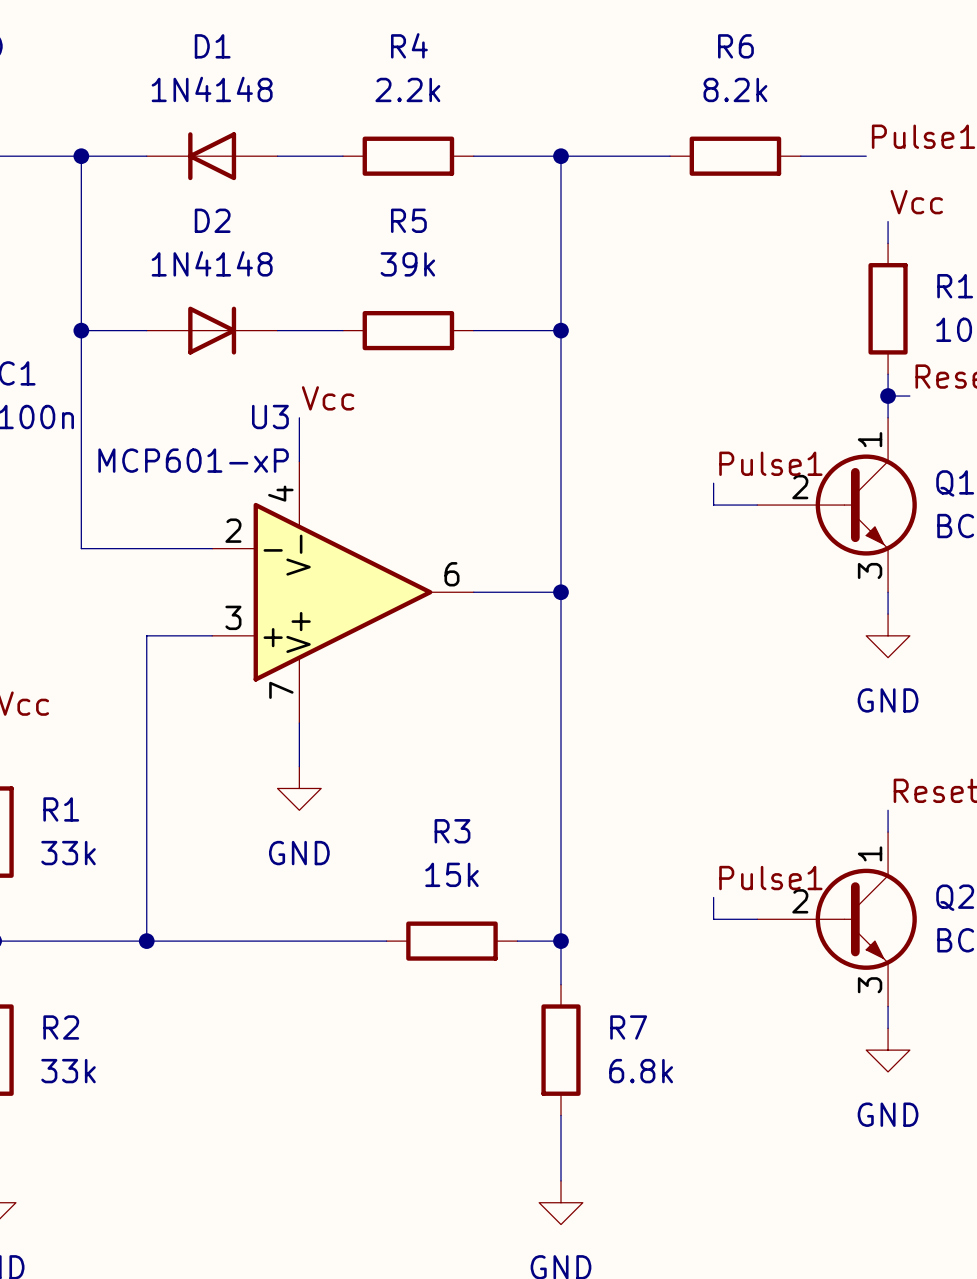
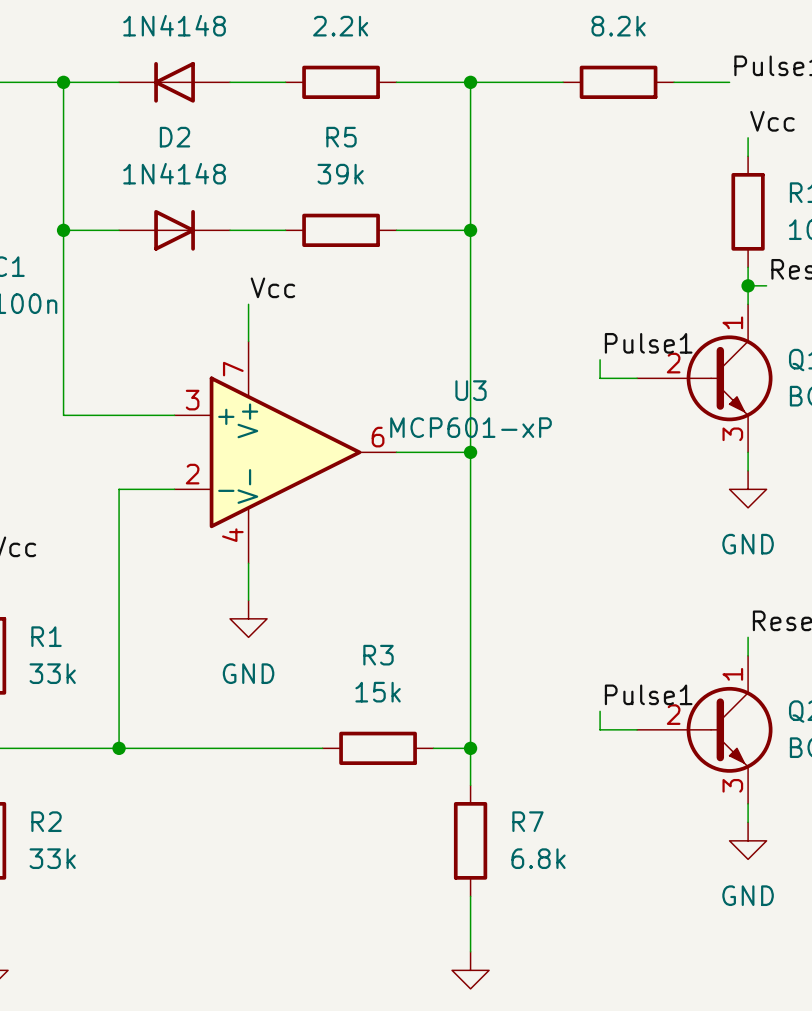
U3 name position: U3 (270, 417) -> U3 (471, 390)
U3 value position: MCP601-xP (193, 460) -> MCP601-xP (471, 427)
U3 flip: as is (342, 592) -> up-down (285, 452)

